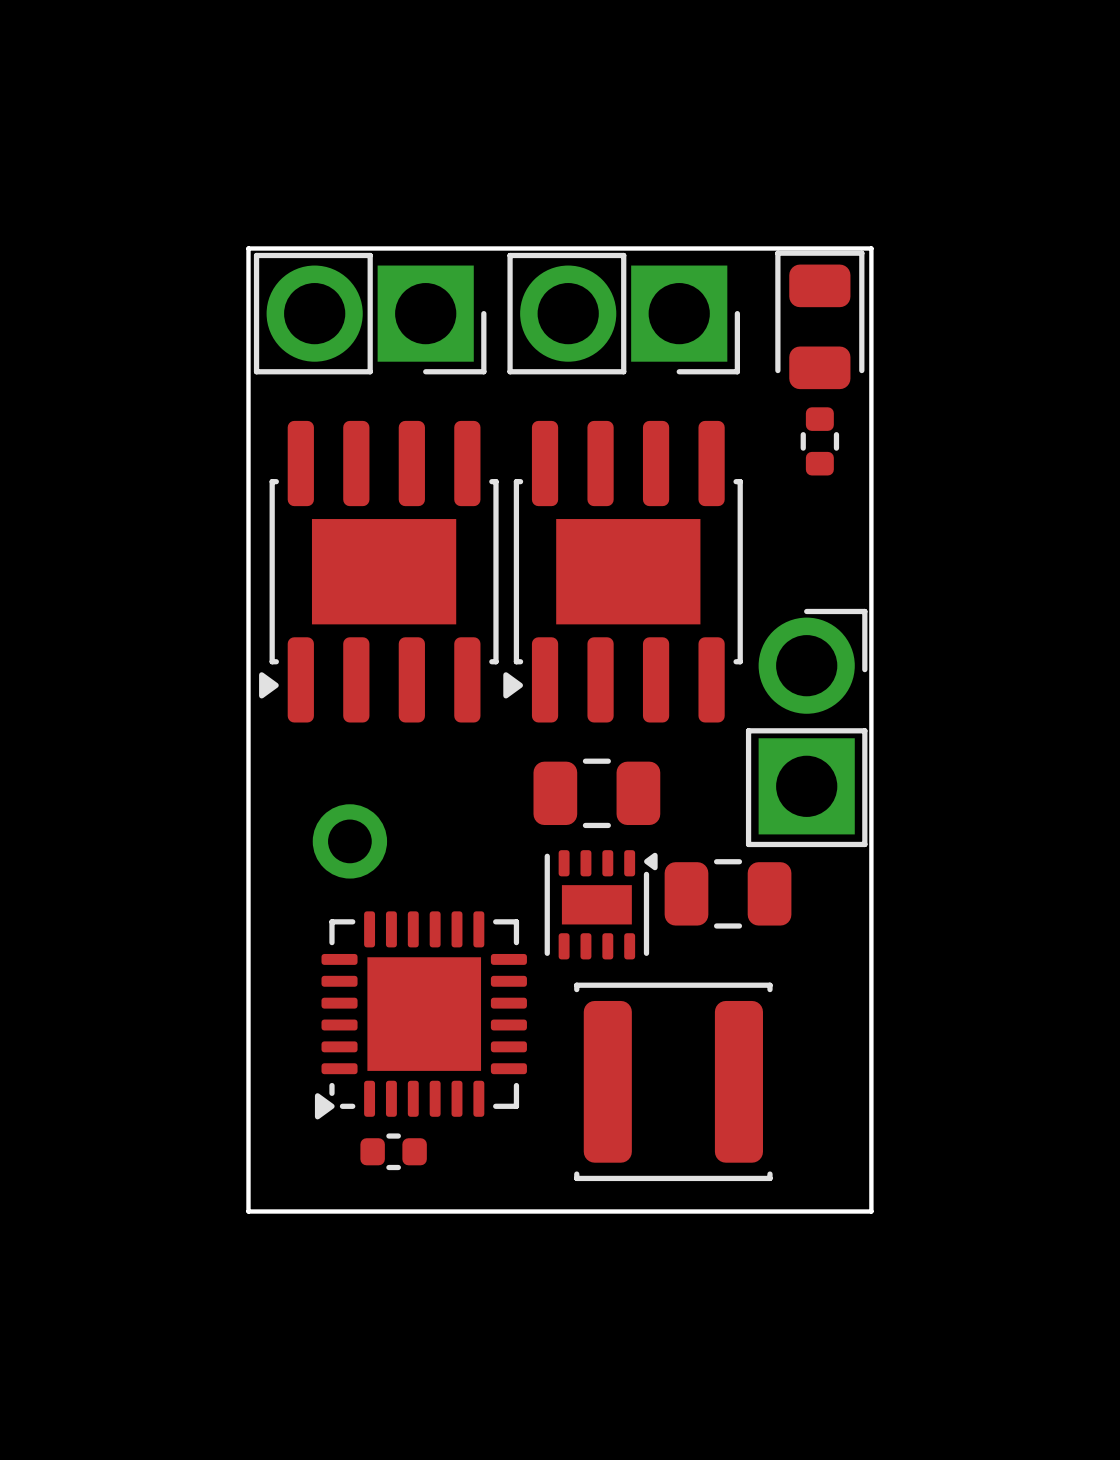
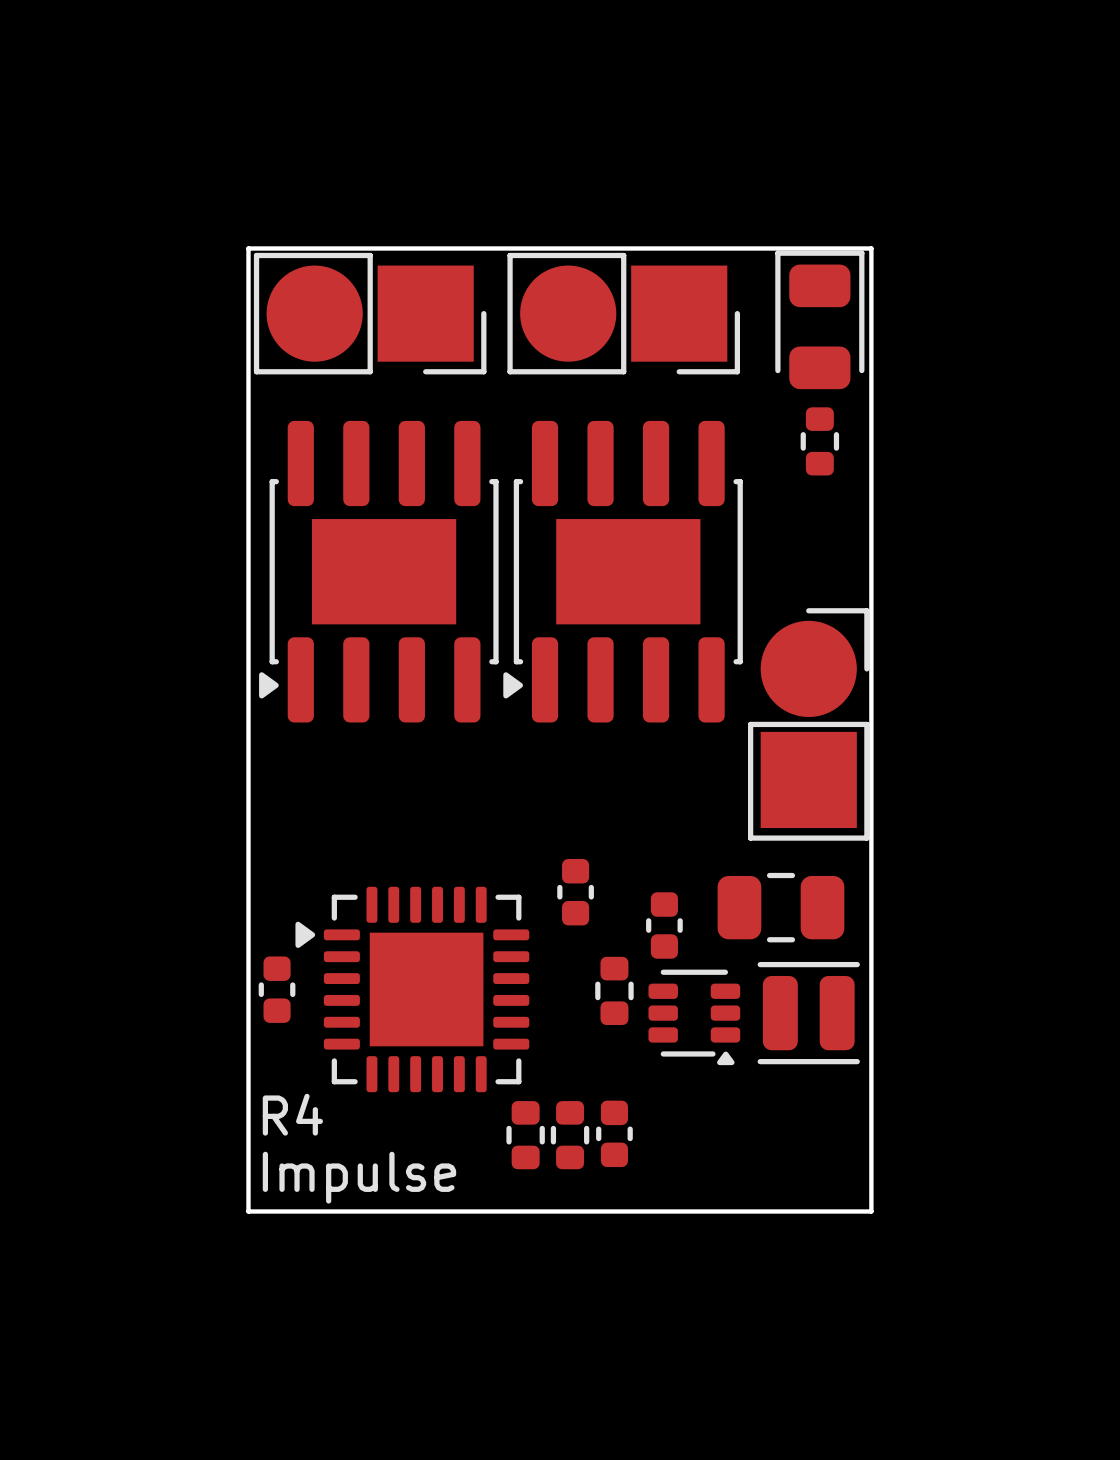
part footprint: [253, 252, 487, 375] -> [253, 252, 487, 375]
part footprint: [507, 252, 740, 375] -> [507, 252, 740, 375]
part footprint: [745, 608, 868, 848] -> [747, 608, 870, 841]
part: (596, 793) -> none
part: (349, 841) -> none
part footprint: [544, 850, 658, 960] -> [557, 858, 594, 926]
part position: (728, 893) -> (781, 907)
part footprint: [314, 911, 527, 1120] -> [295, 886, 530, 1093]
part: none -> (664, 925)
part: none -> (277, 989)
part: none -> (614, 990)
part: none -> (808, 1013)
part: none -> (694, 1017)
part: (673, 1081) -> none
text: none -> R4 (292, 1114)
part: none -> (614, 1133)
part: none -> (525, 1135)
part: none -> (570, 1135)
part: (393, 1151) -> none
text: none -> Impulse (359, 1177)

